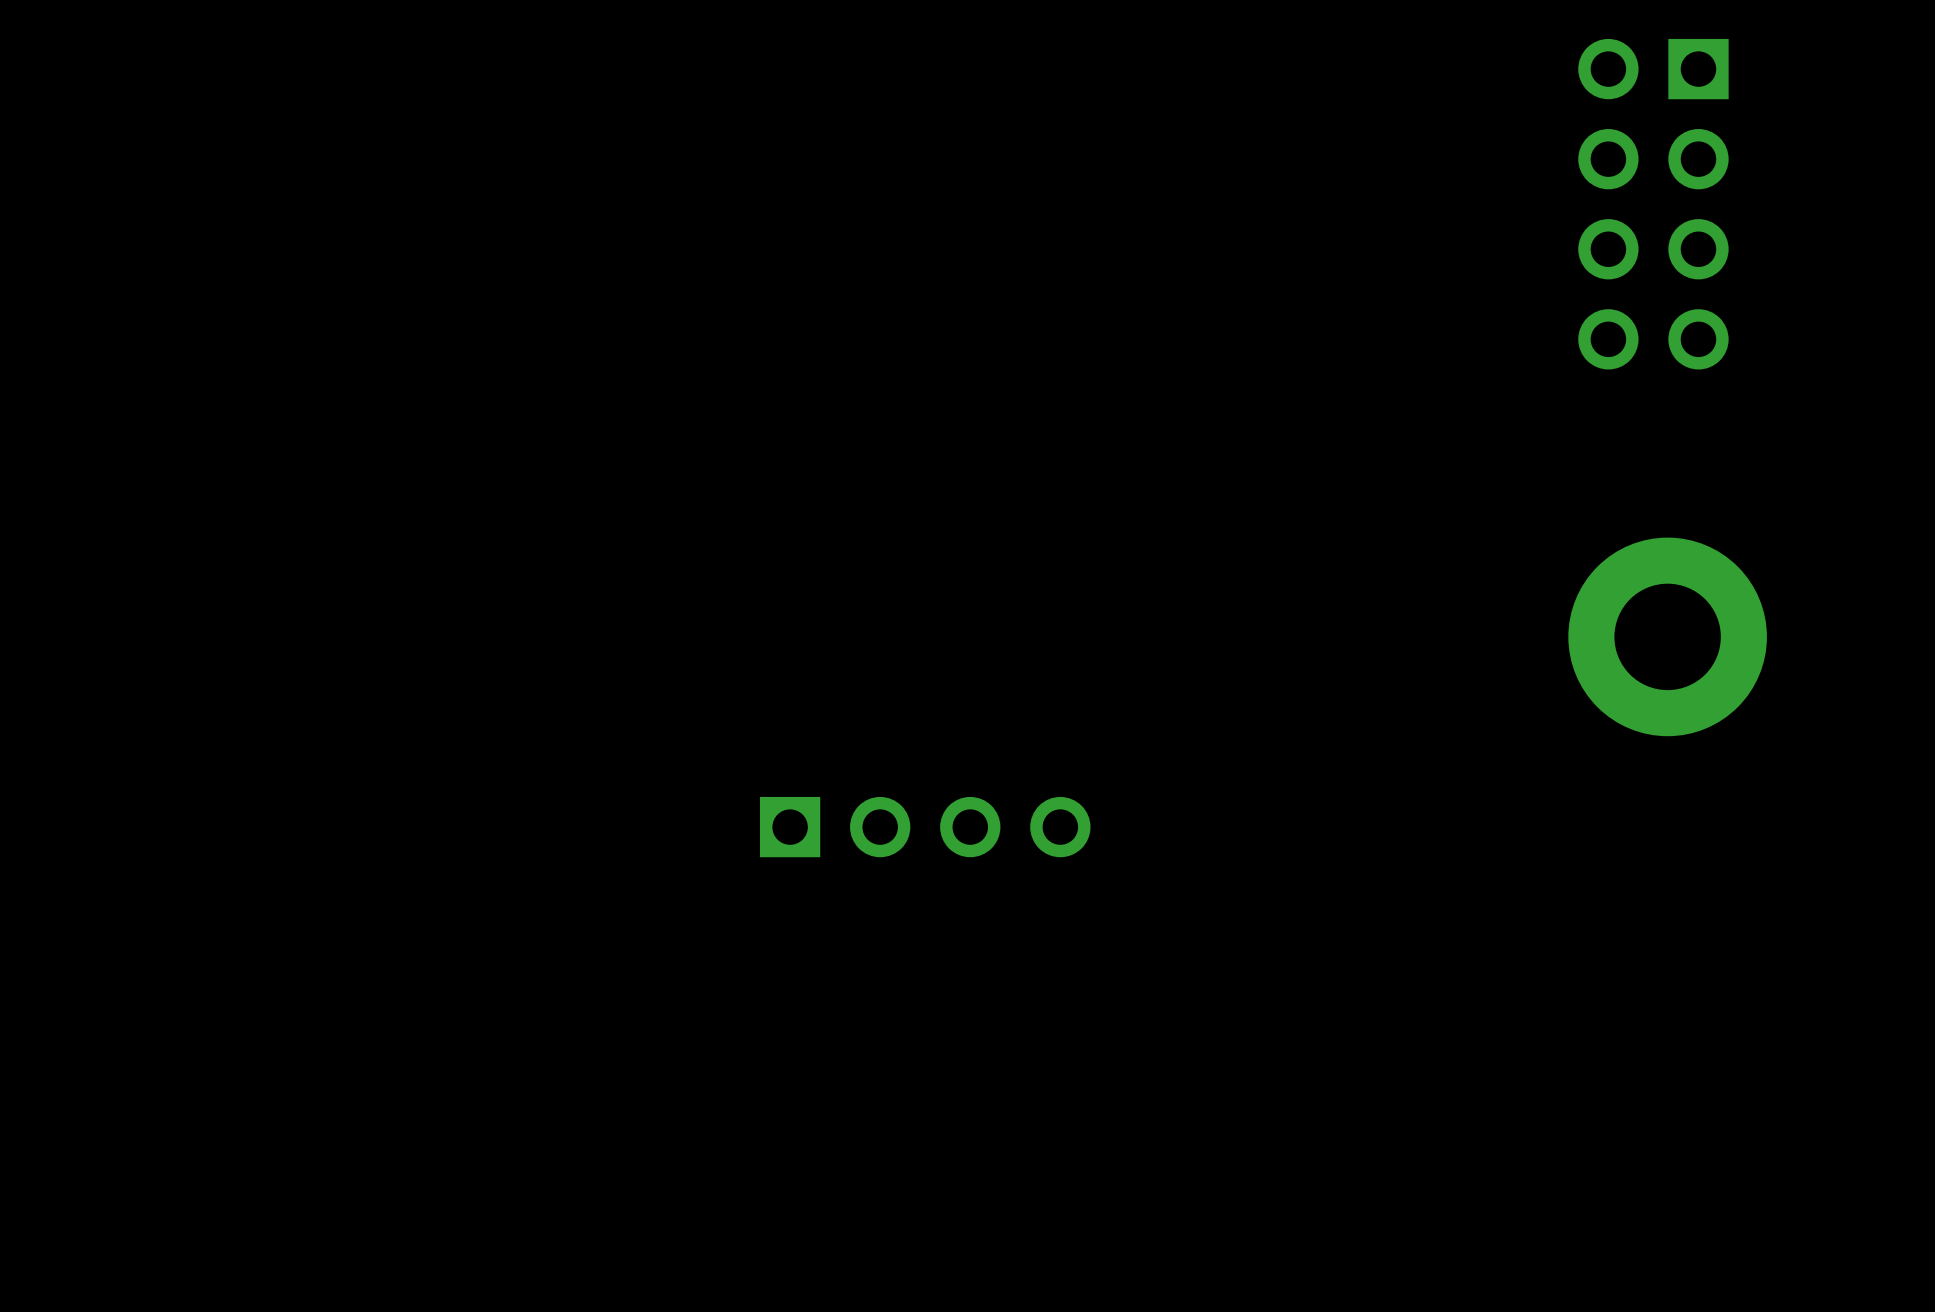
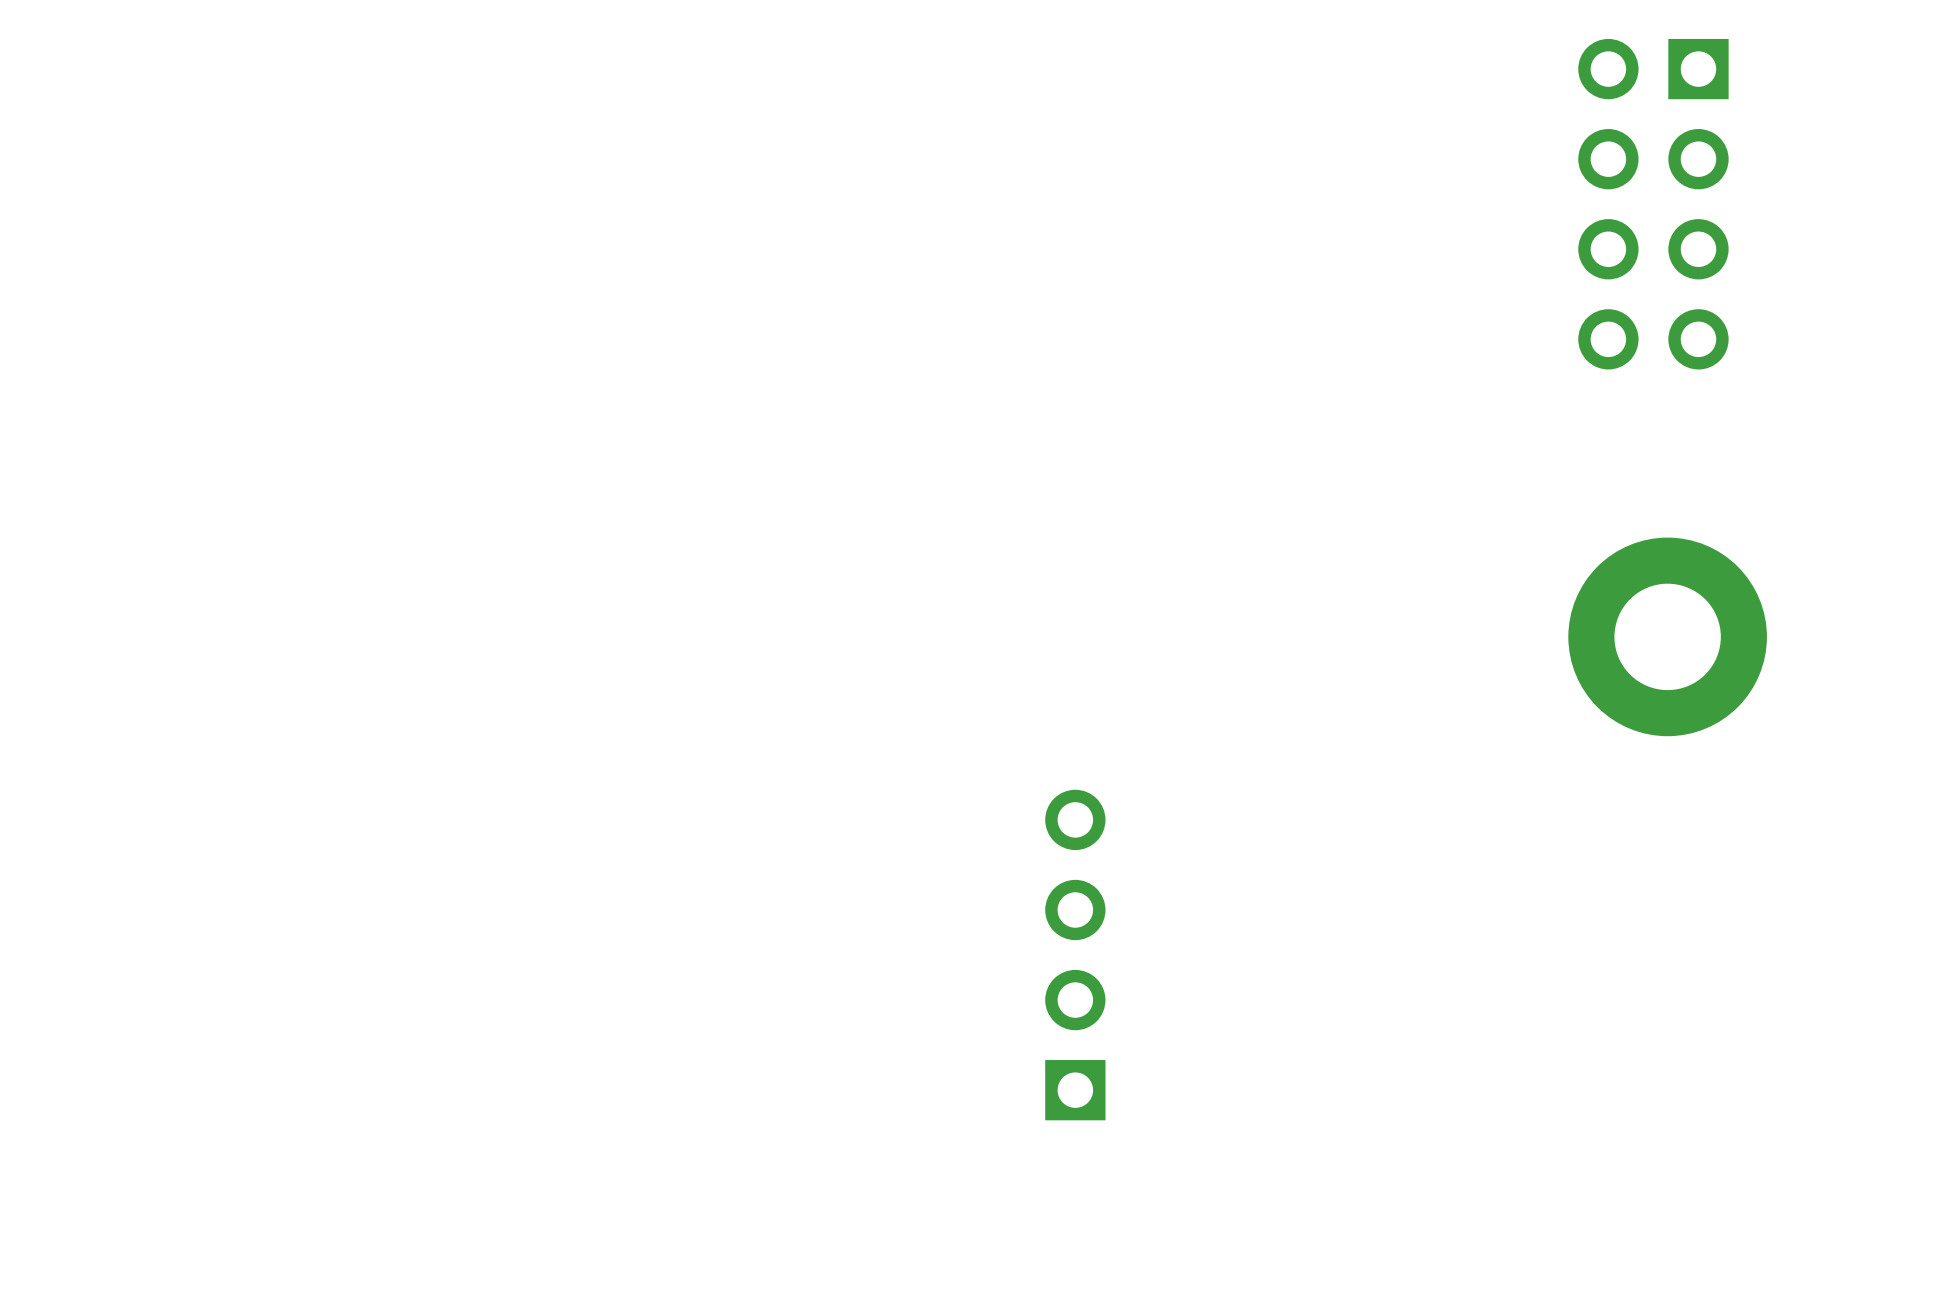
part rotation: 0° (925, 827) -> 90° counterclockwise (1075, 955)

